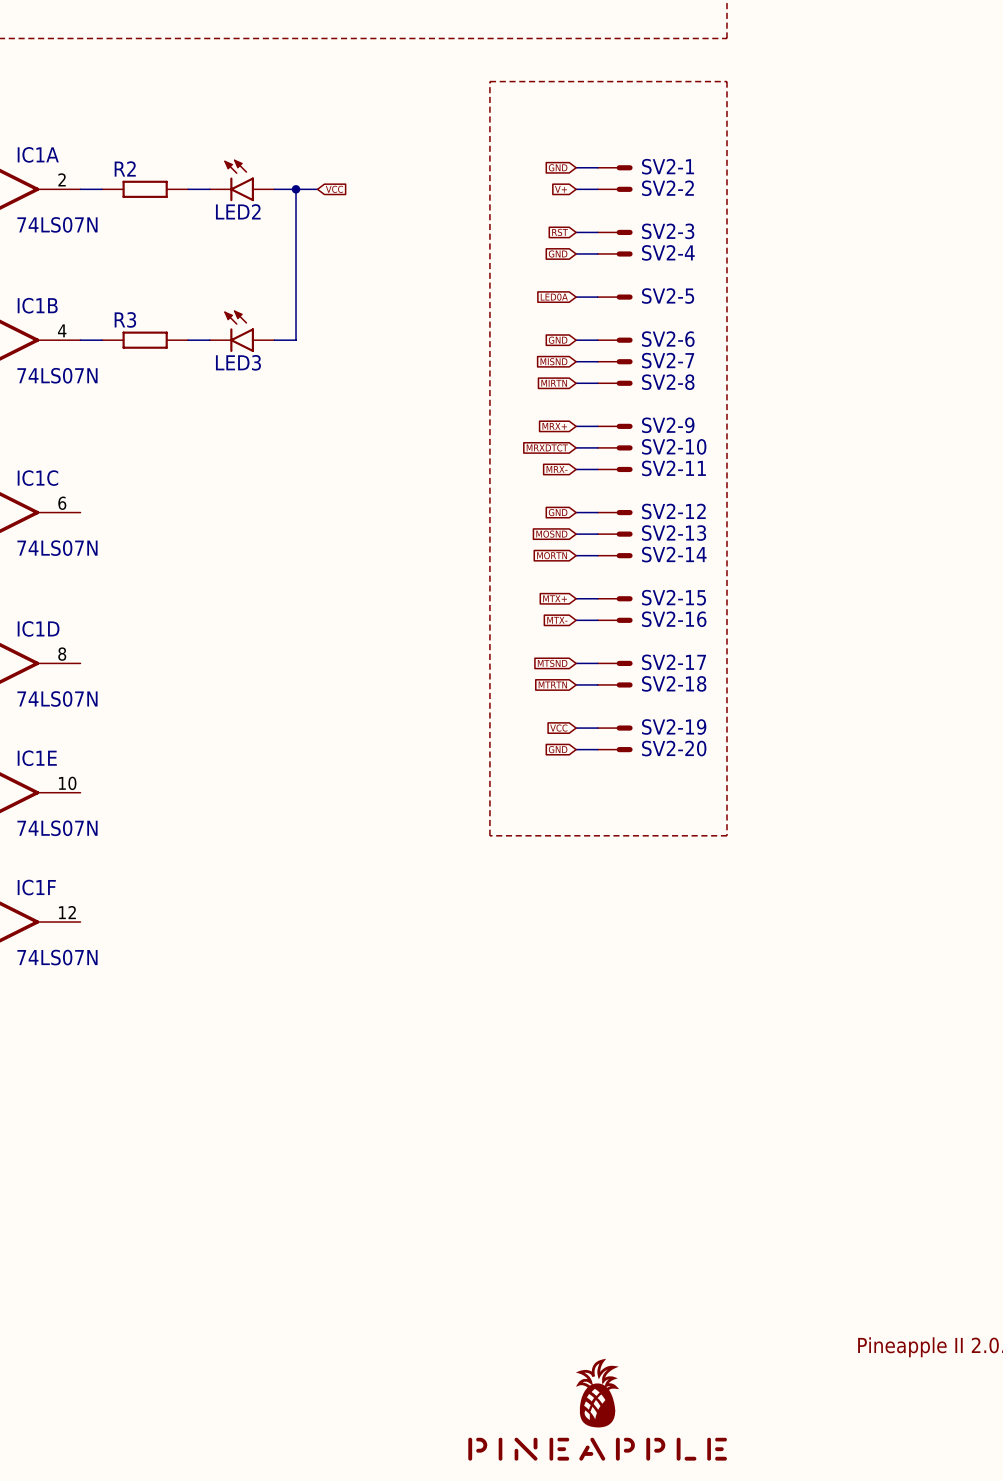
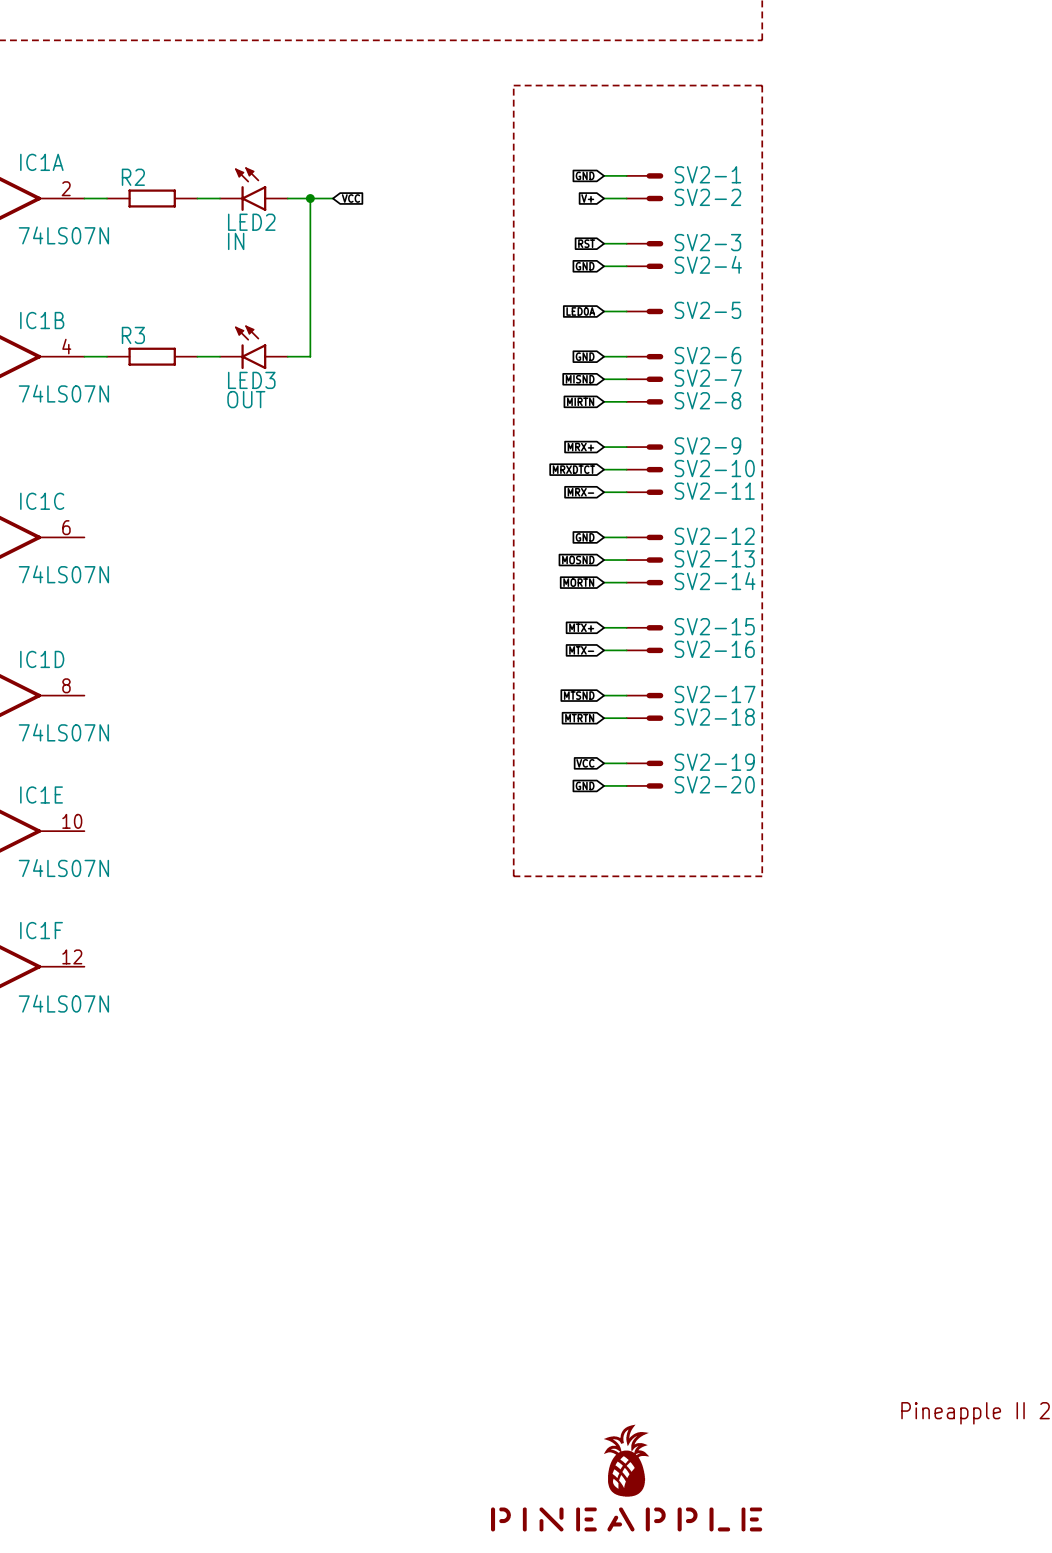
LED2 value: none -> IN (236, 241)
LED3 value: none -> OUT (246, 399)

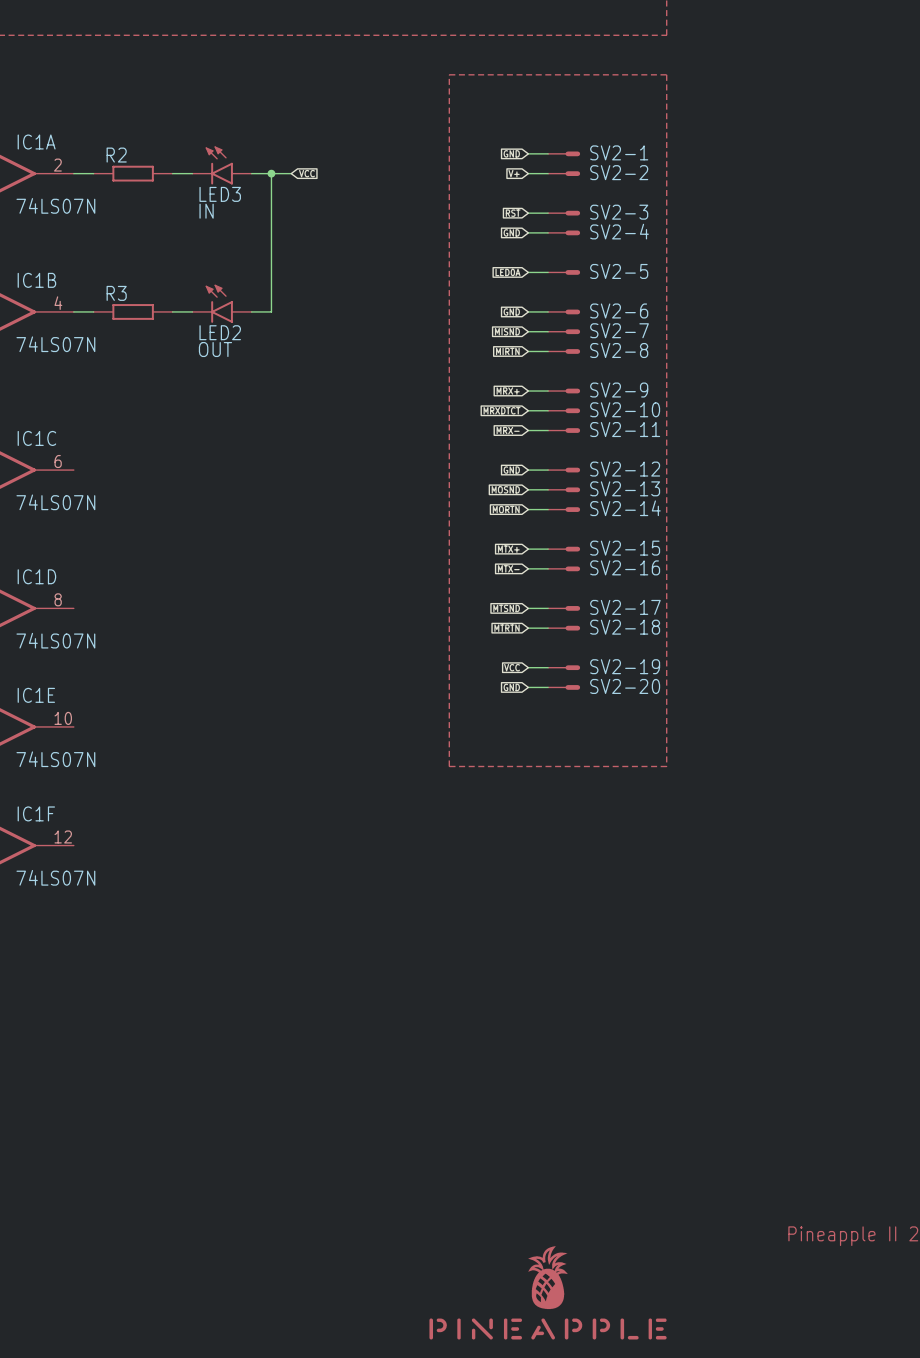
LED2 name: LED2 (251, 222) -> LED3 (220, 194)
LED3 name: LED3 (251, 380) -> LED2 (220, 332)

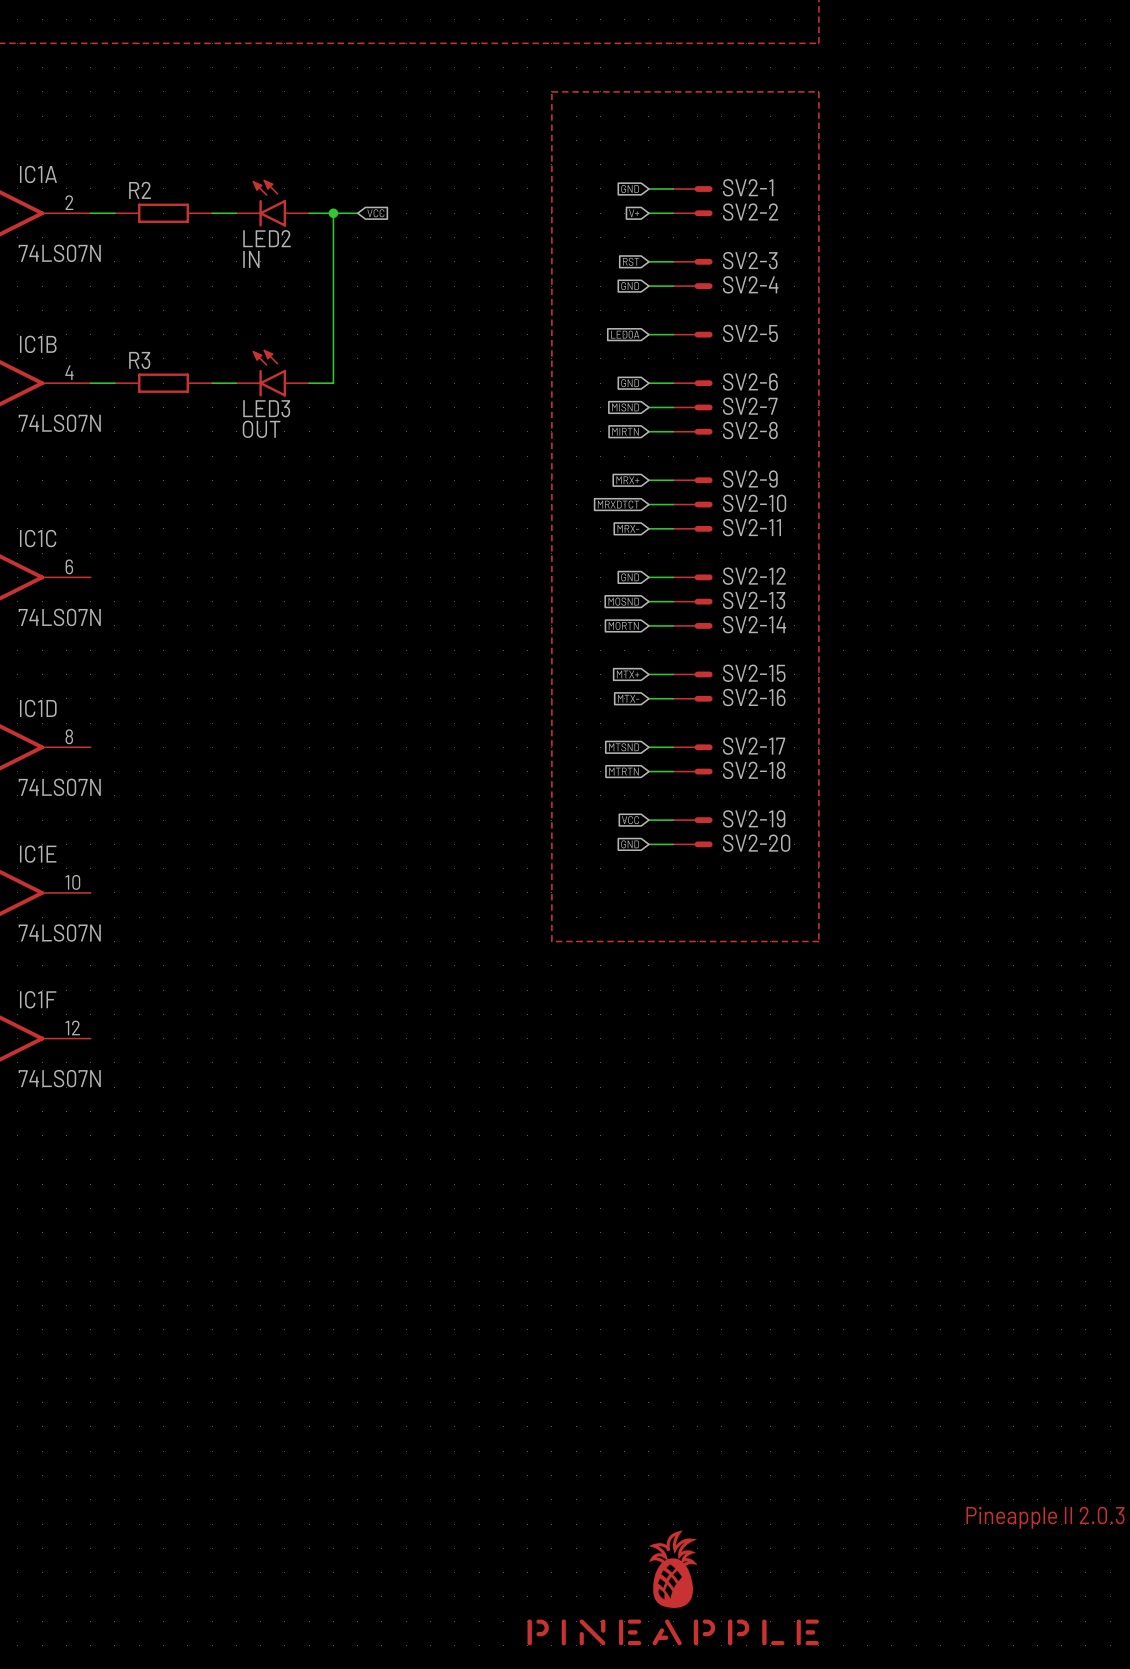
LED3 name: LED3 (220, 194) -> LED2 (267, 238)
LED2 name: LED2 (220, 332) -> LED3 (266, 408)

